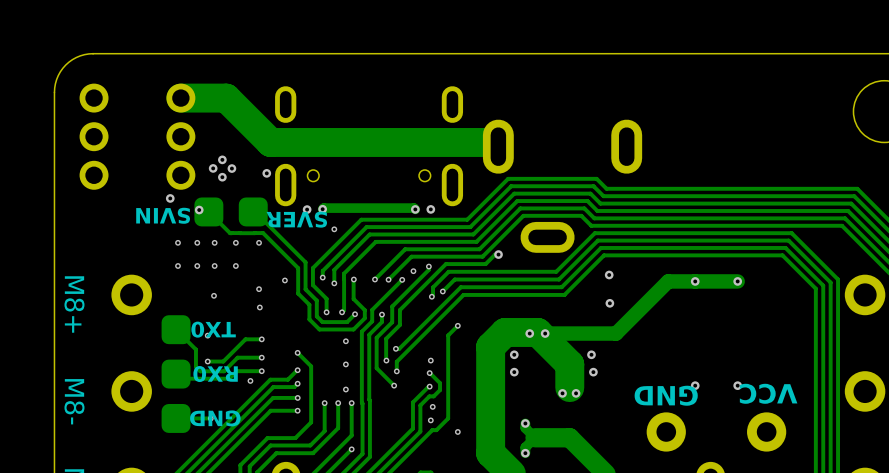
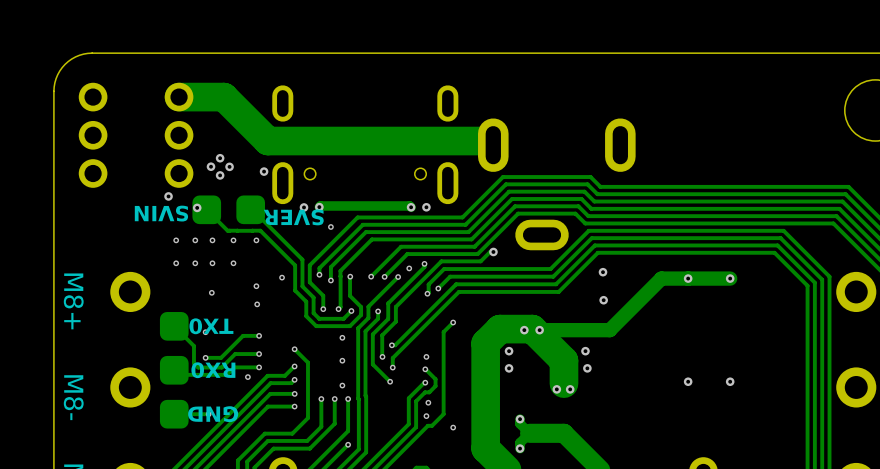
text: VCC (768, 393) -> none
text: GND (666, 395) -> none
part: (666, 431) -> none
part: (766, 431) -> none

